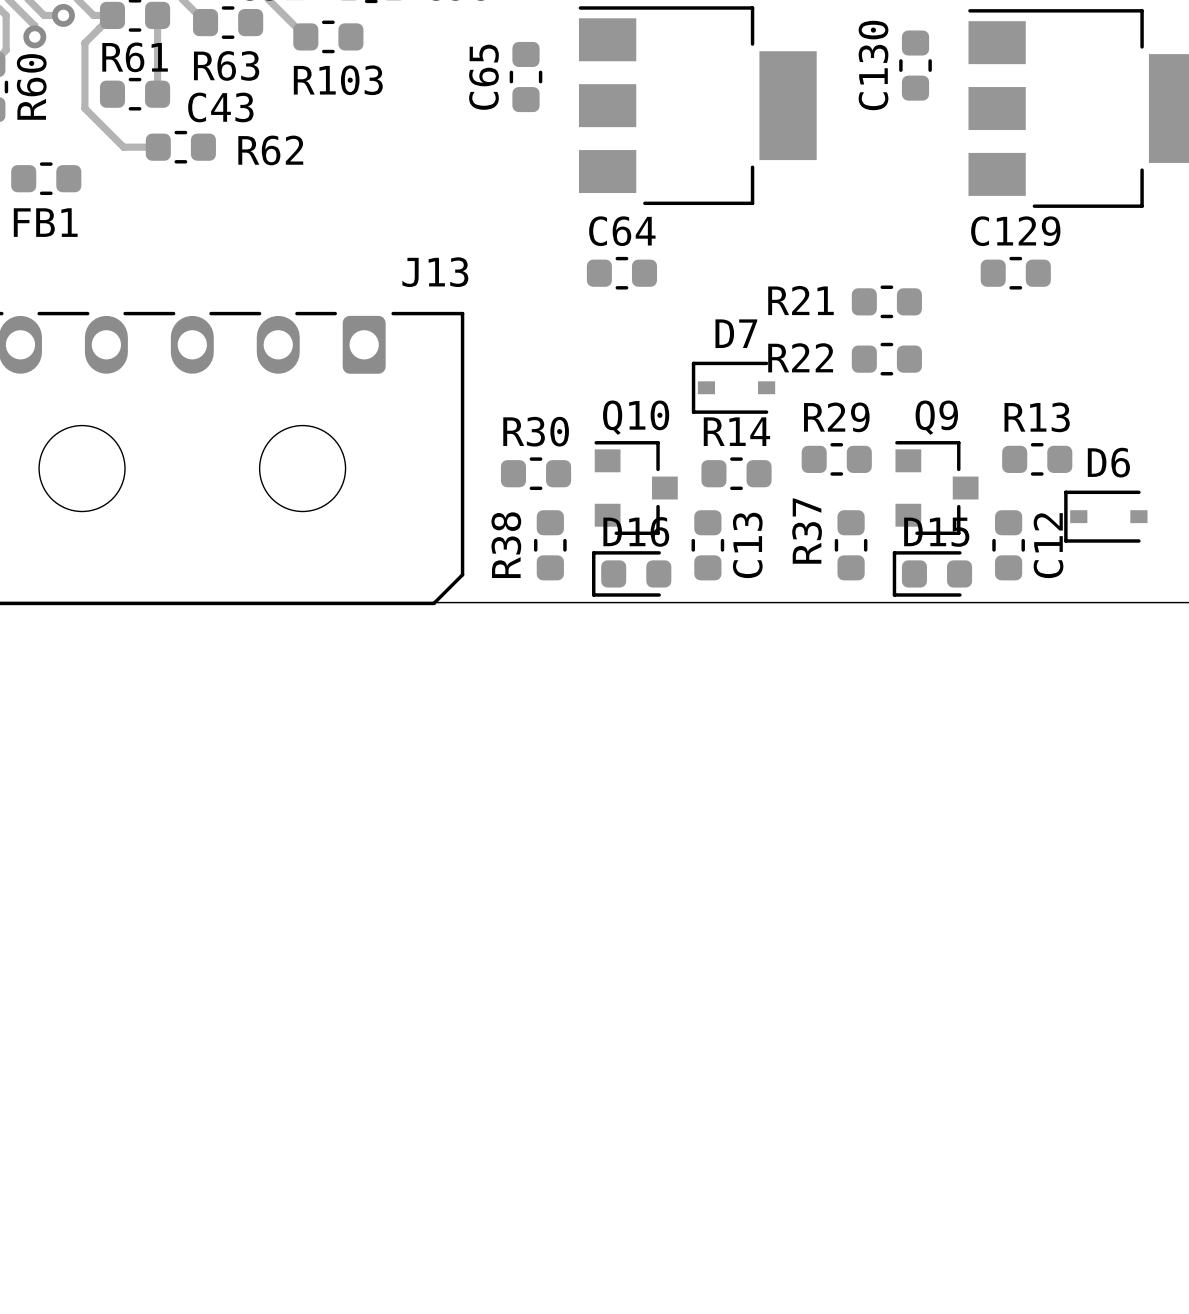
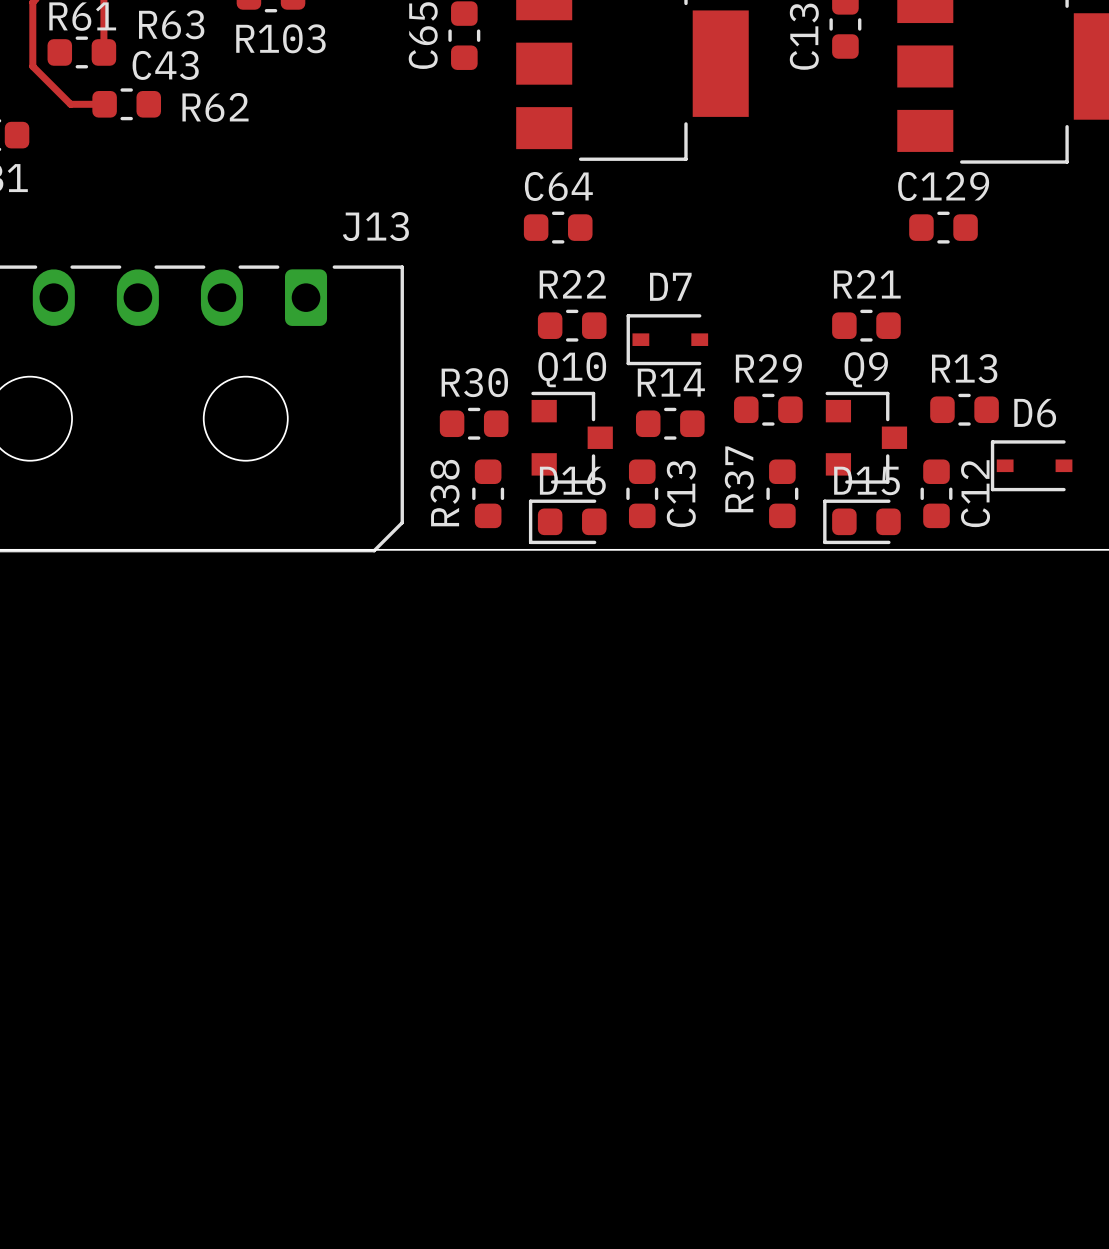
R21 name position: R21 (800, 300) -> R21 (867, 284)
R21 position: (886, 301) -> (866, 325)
R22 name position: R22 (800, 357) -> R22 (572, 284)
R22 position: (886, 359) -> (572, 325)

